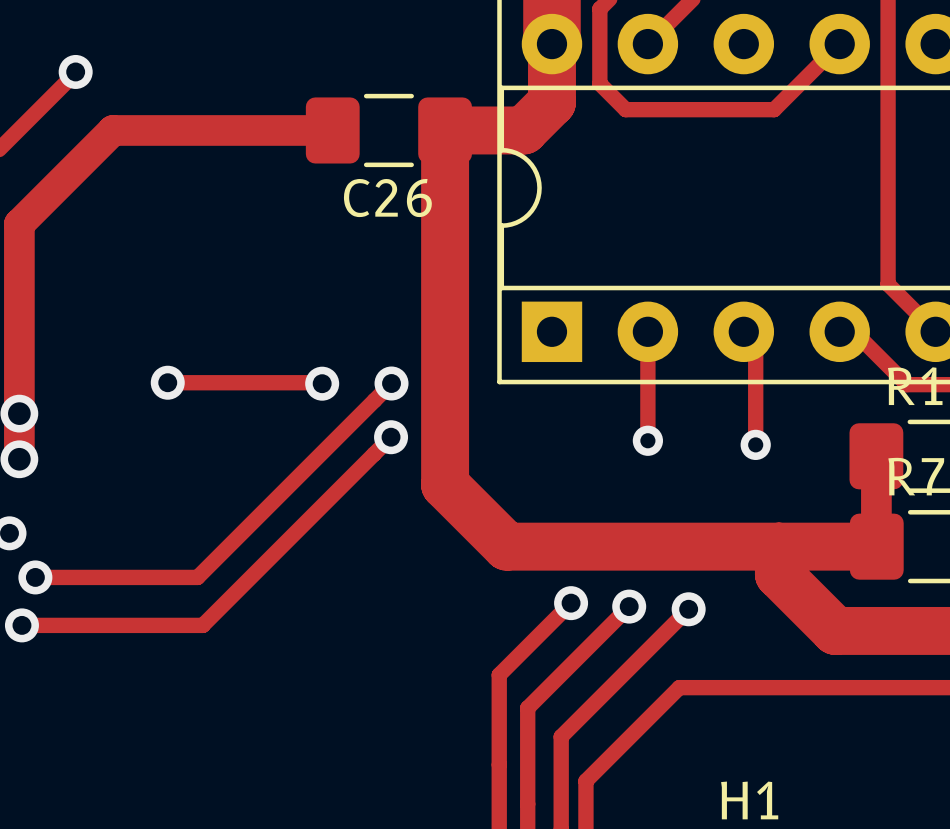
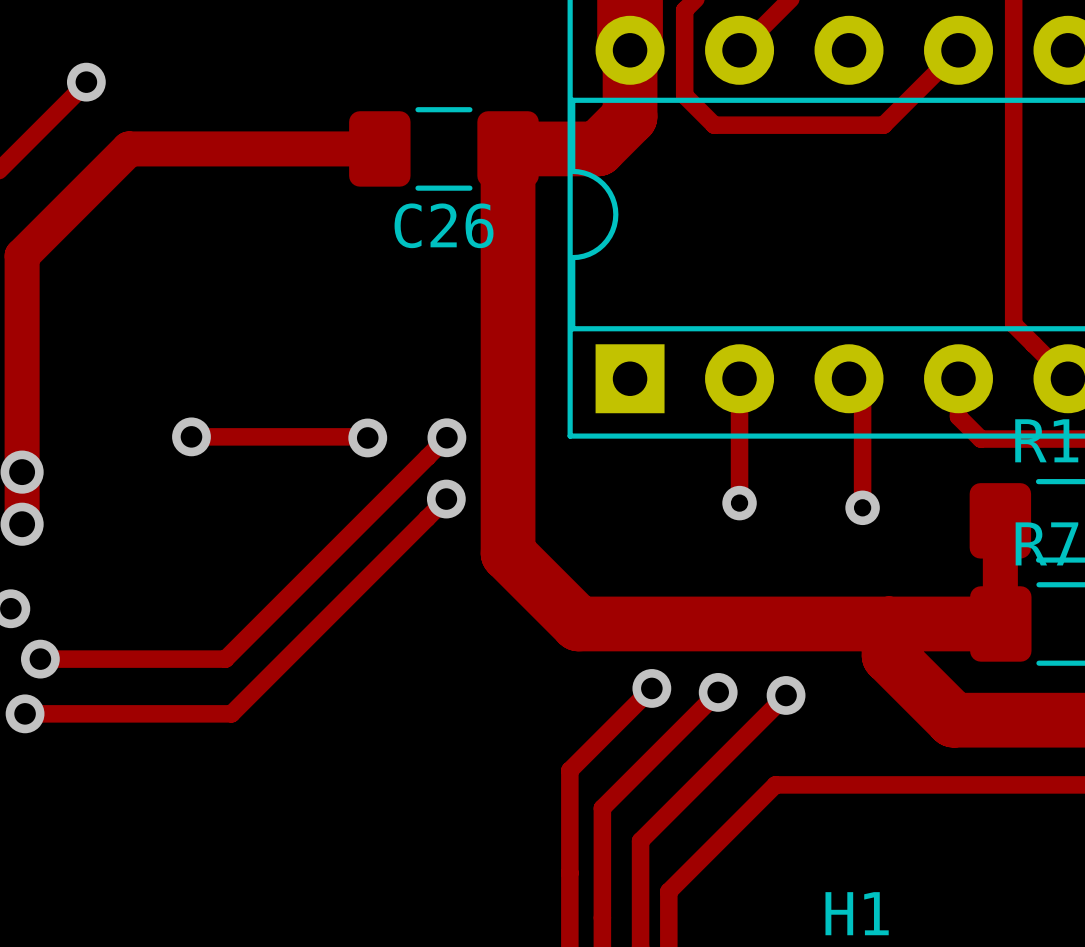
track: (839, 317) (906, 384) -> (958, 362) (958, 416) (980, 439) (1035, 439)

